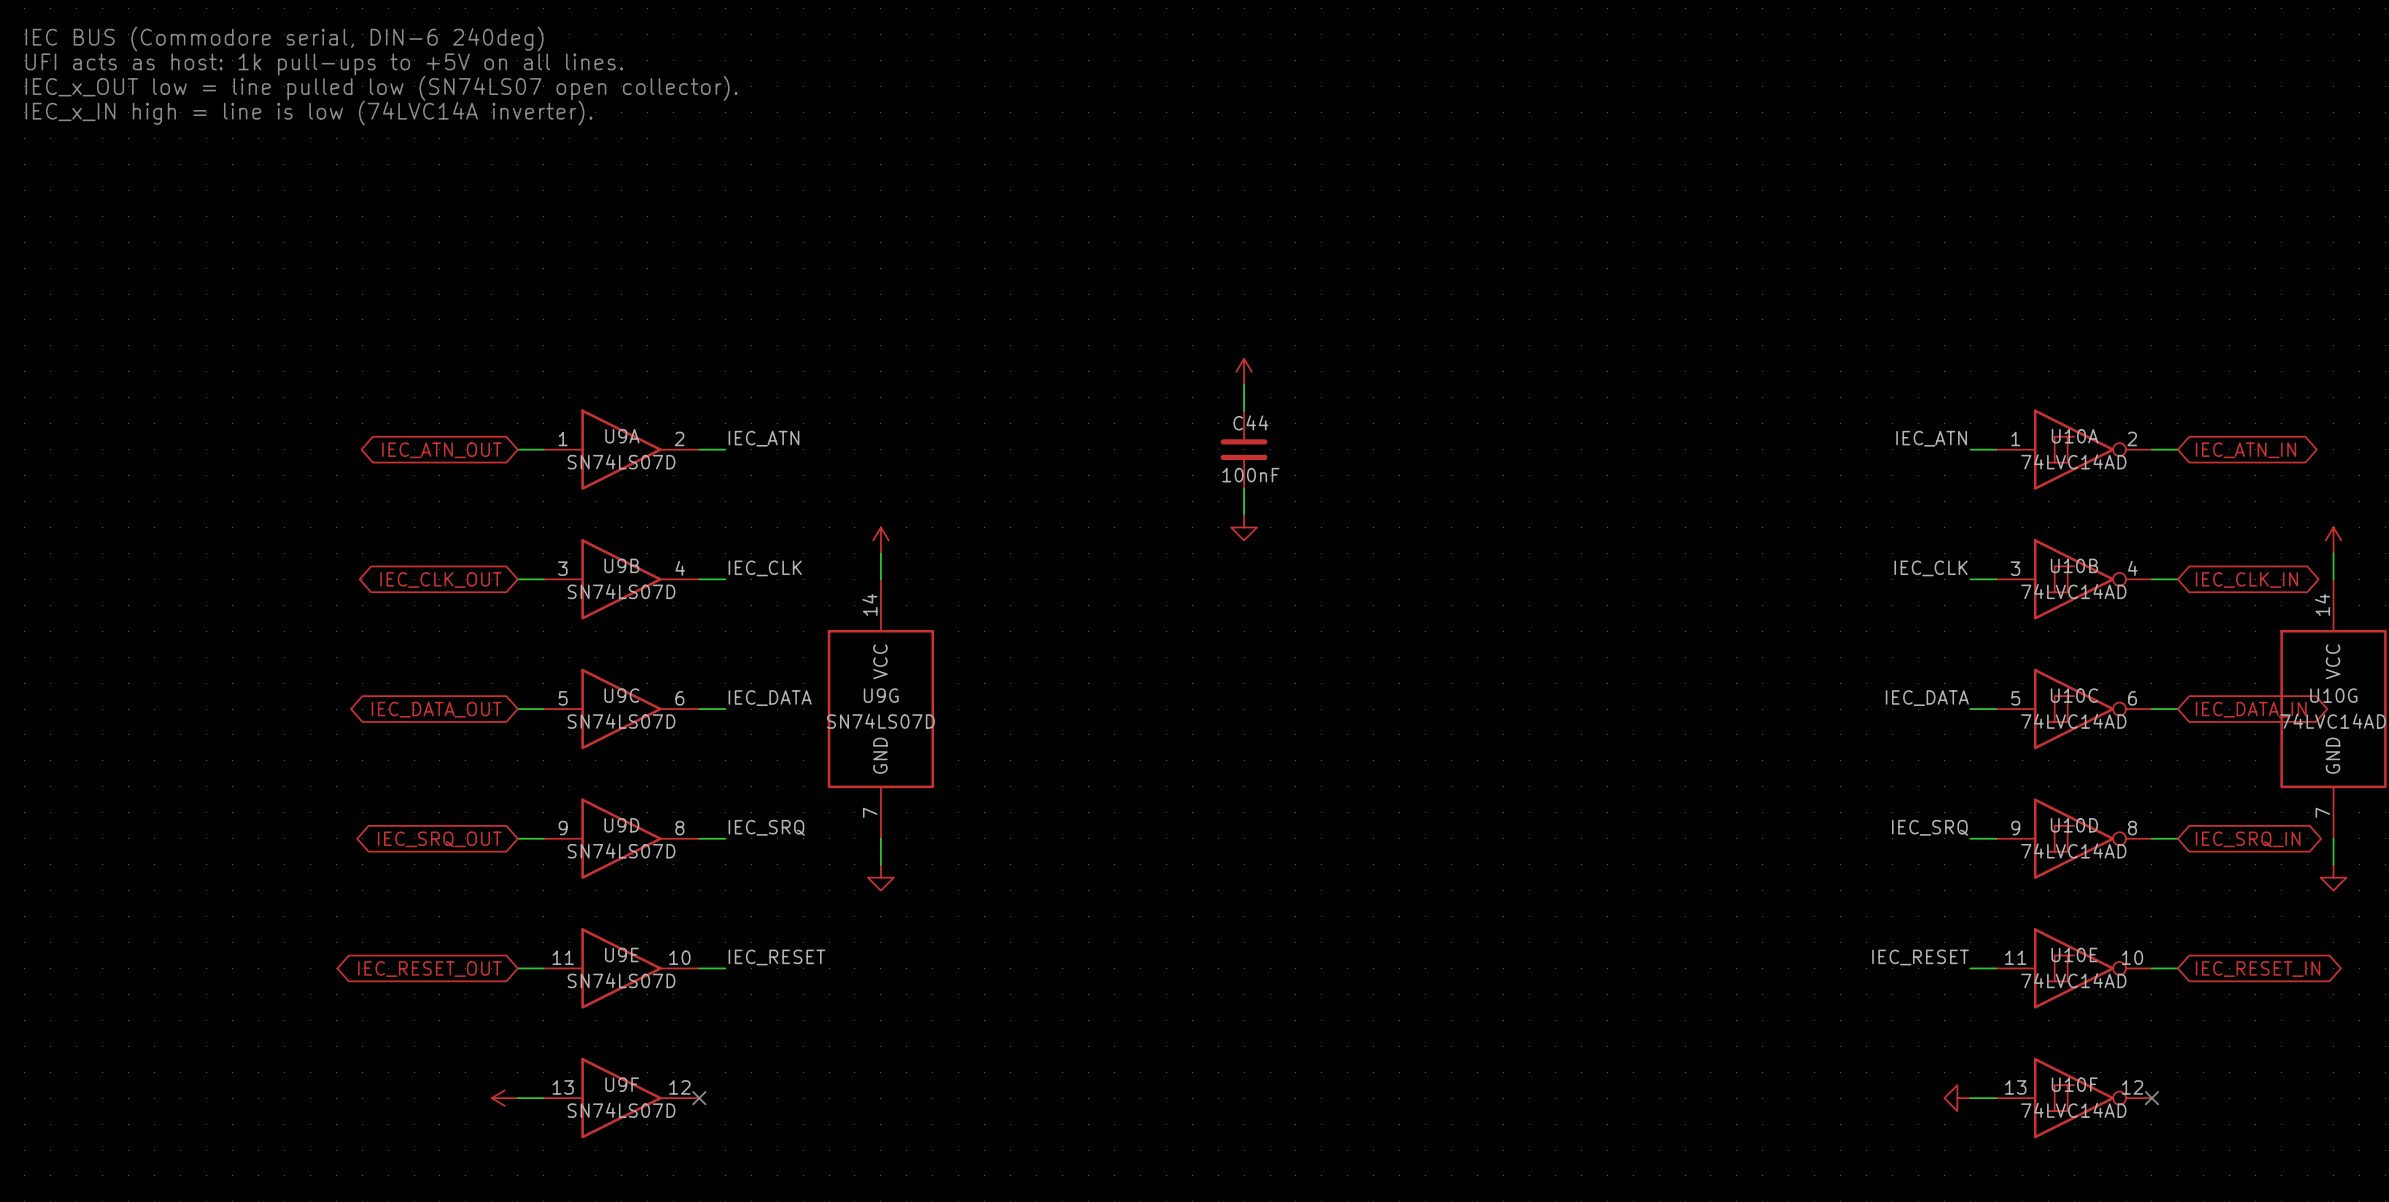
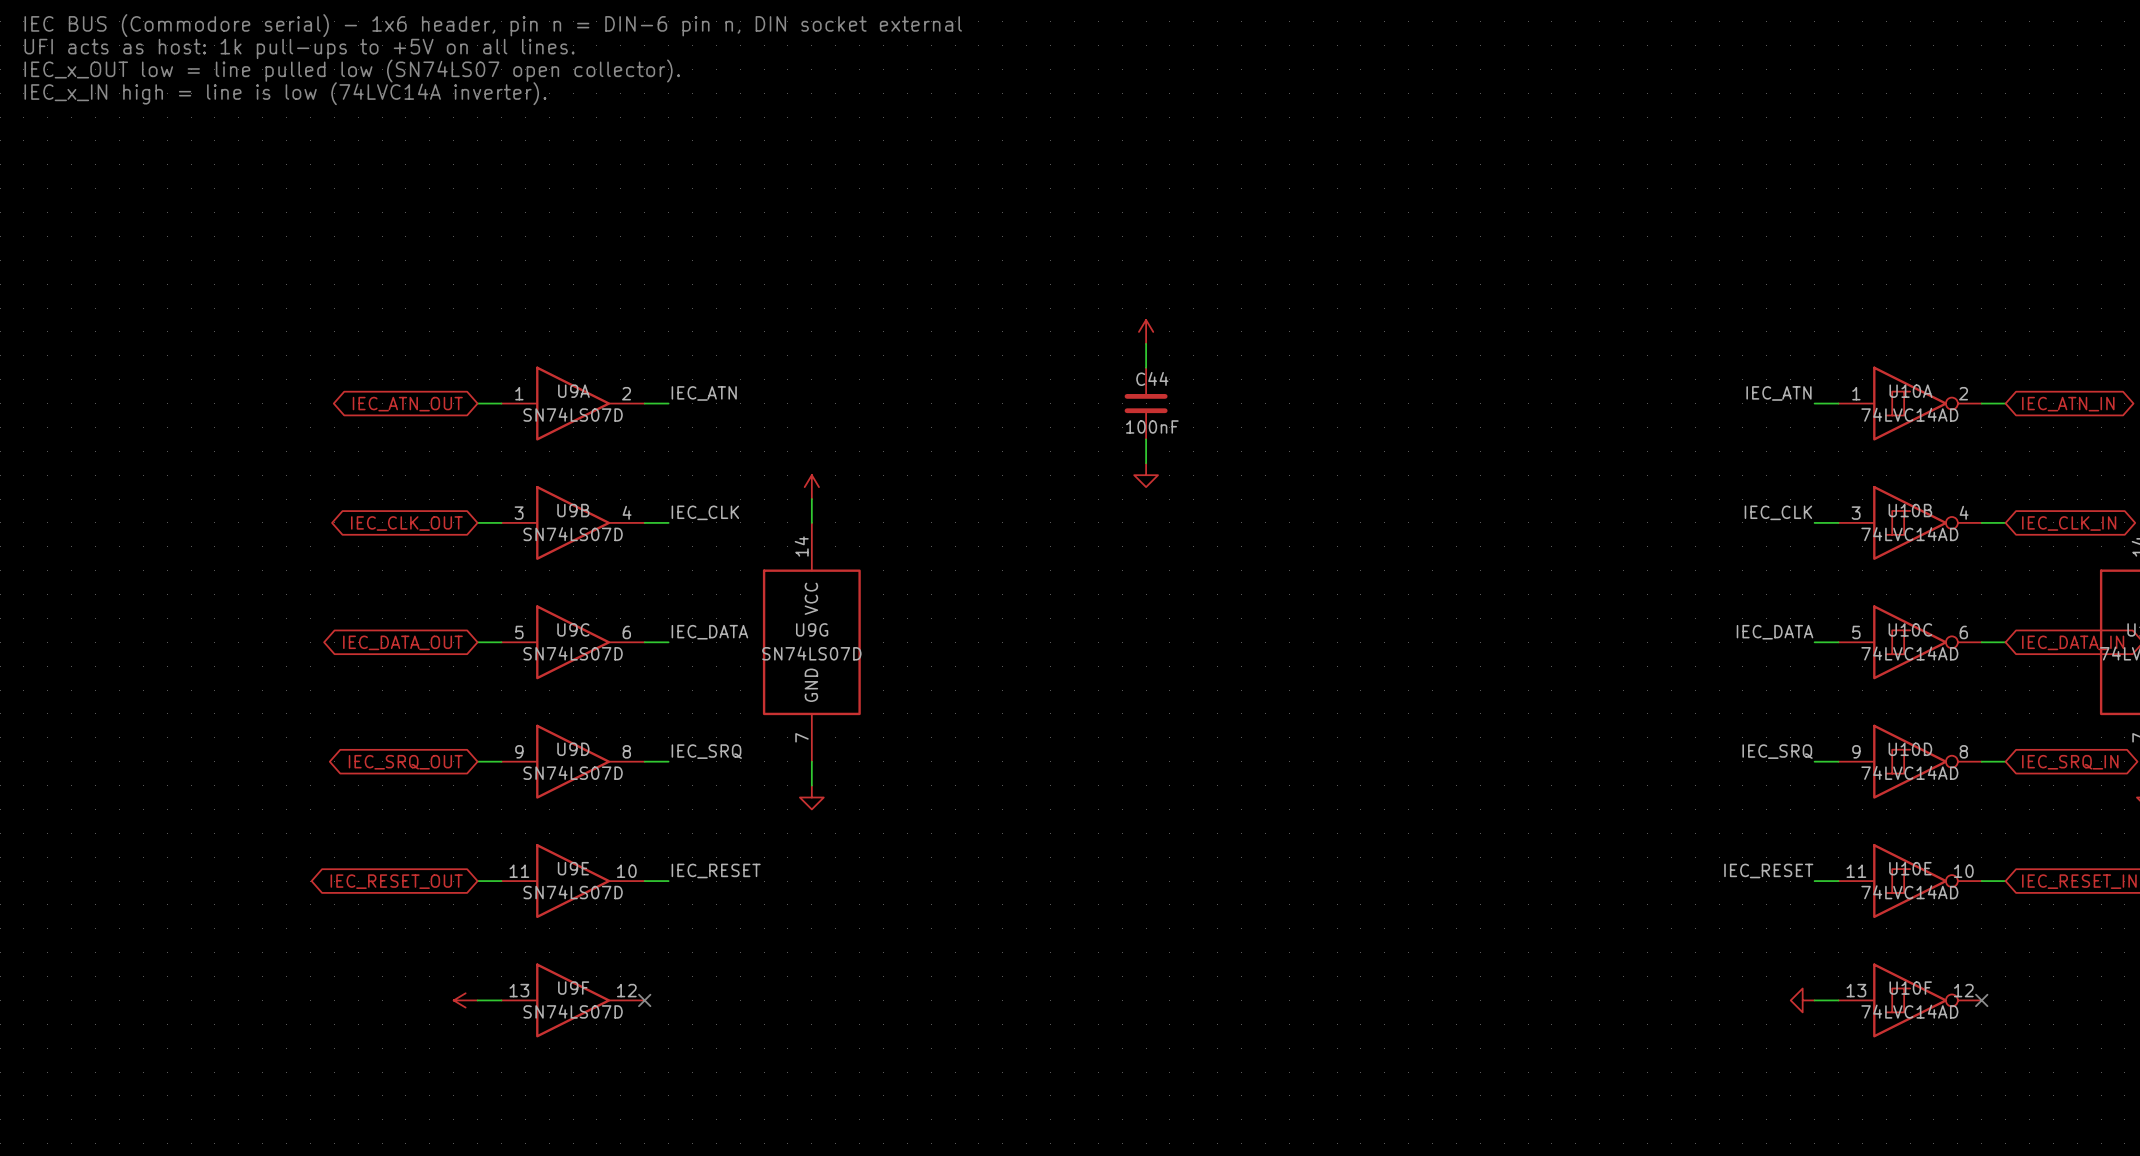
text: IEC BUS (Commodore serial, DIN-6 240deg) (284, 39) -> IEC BUS (Commodore serial) - 1x6 header, pin n = DIN-6 pin n, DIN socket external (493, 25)

